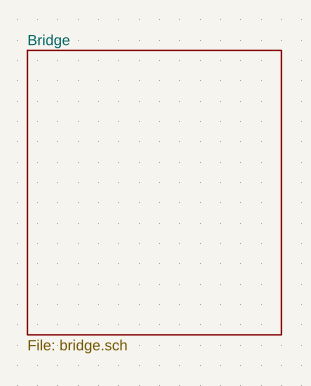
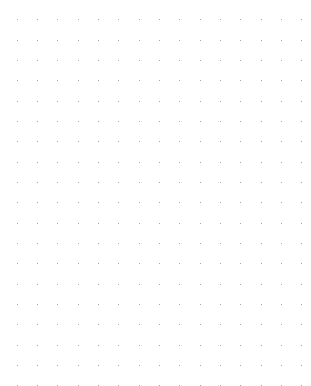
sheet Bridge: File: bridge.sch (154, 192) -> none

